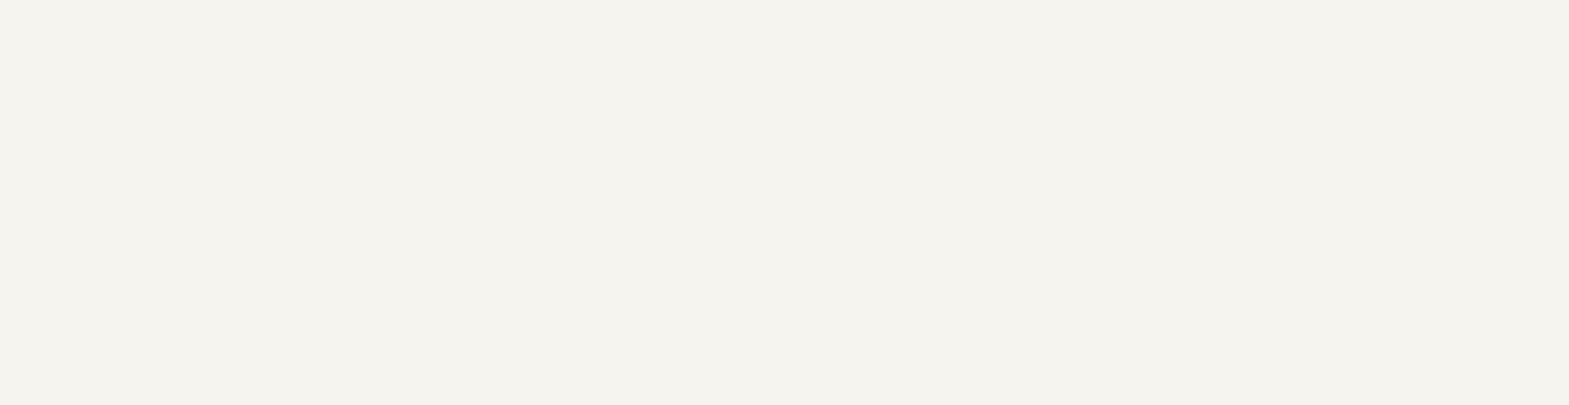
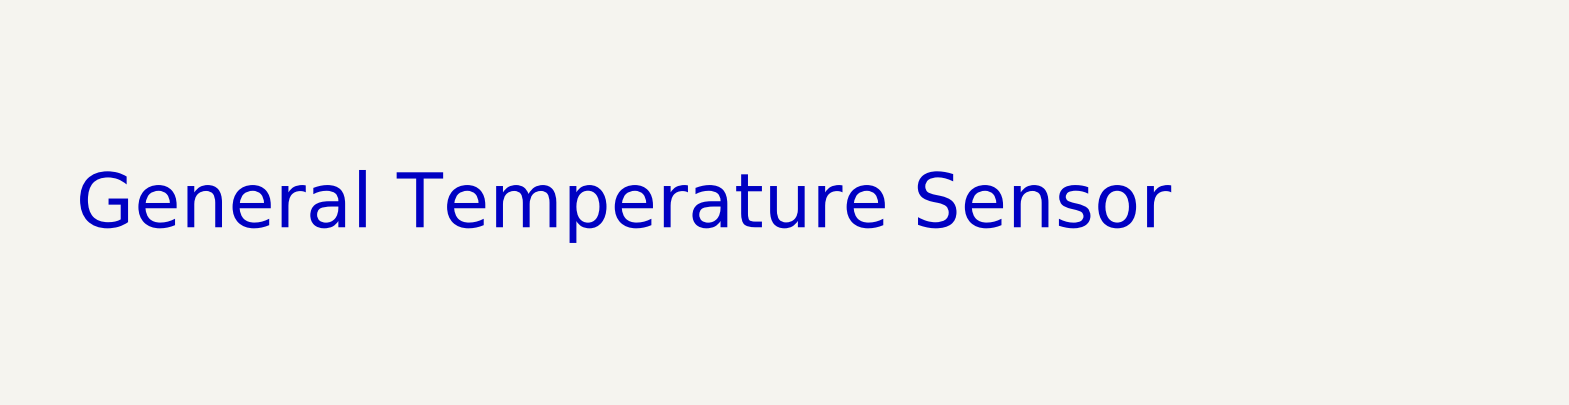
text: none -> General Temperature Sensor (625, 206)

